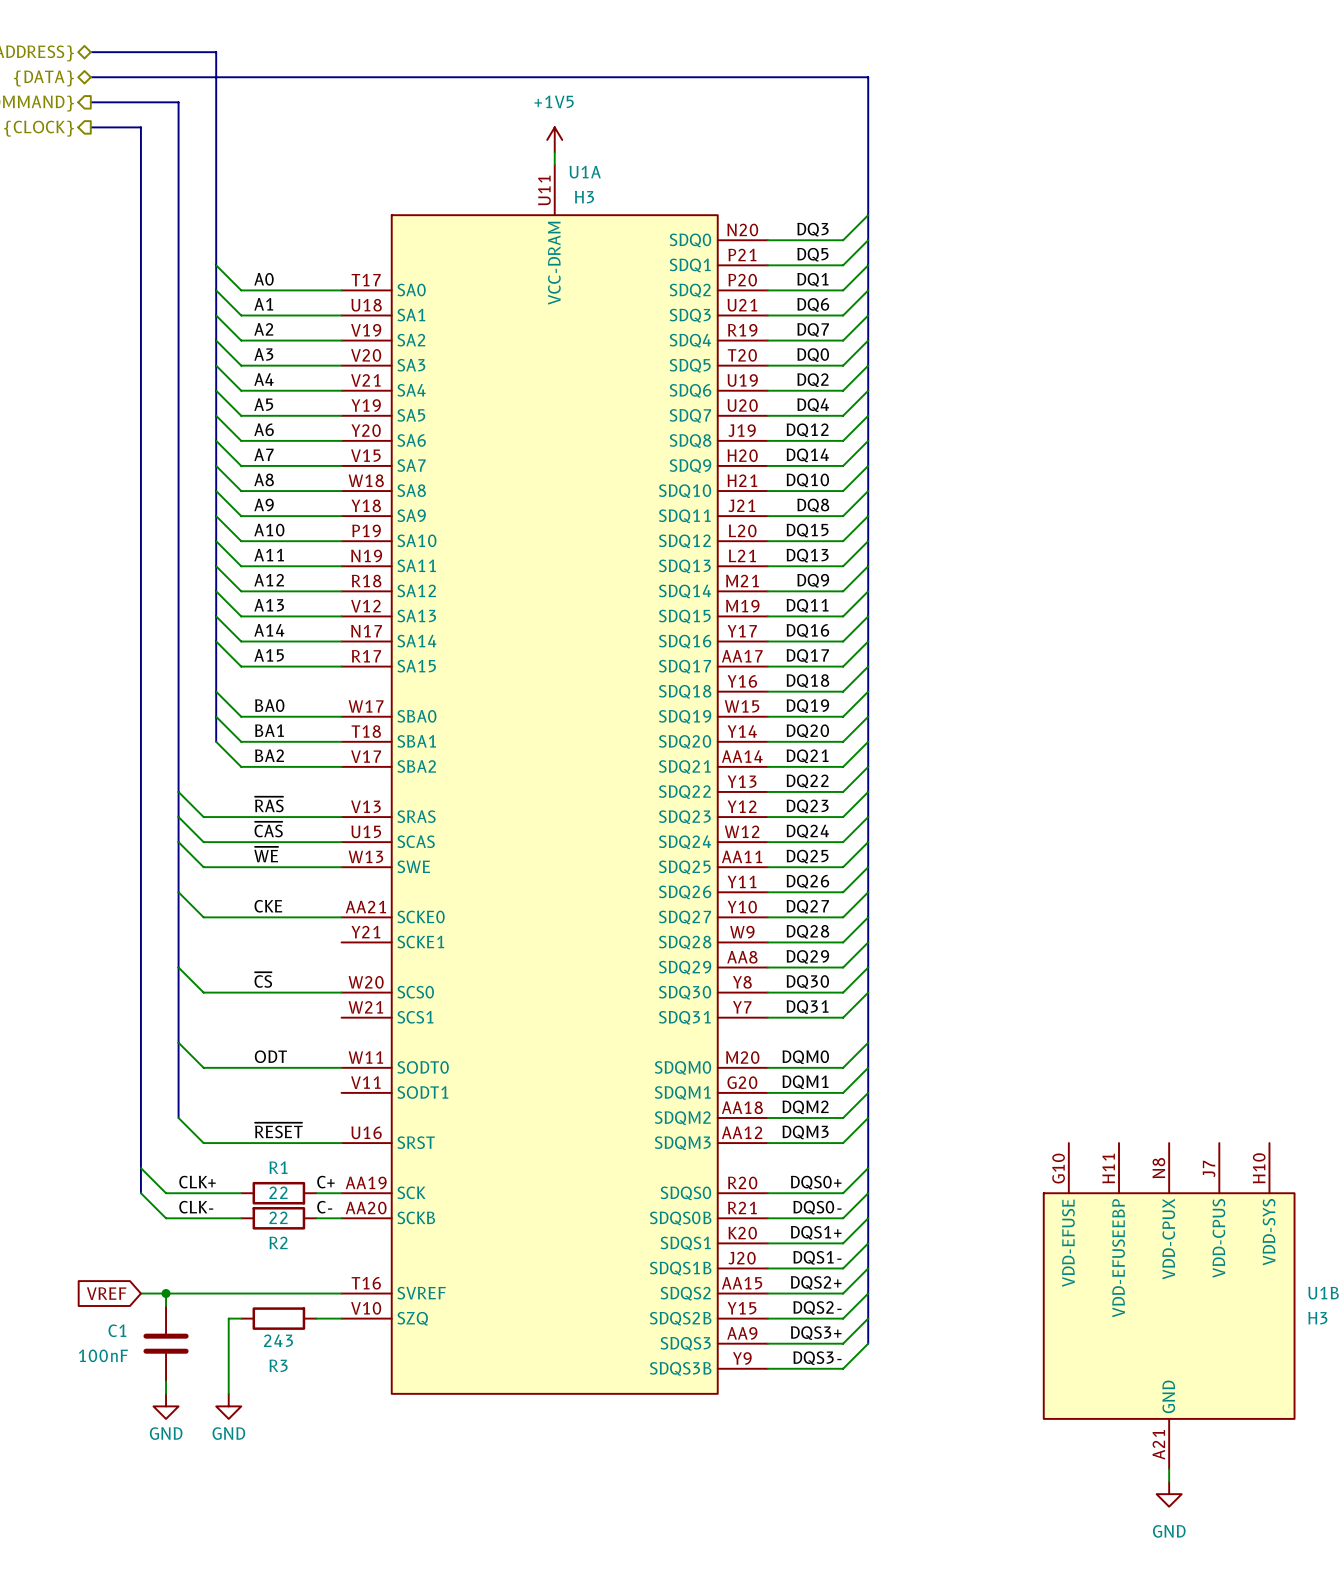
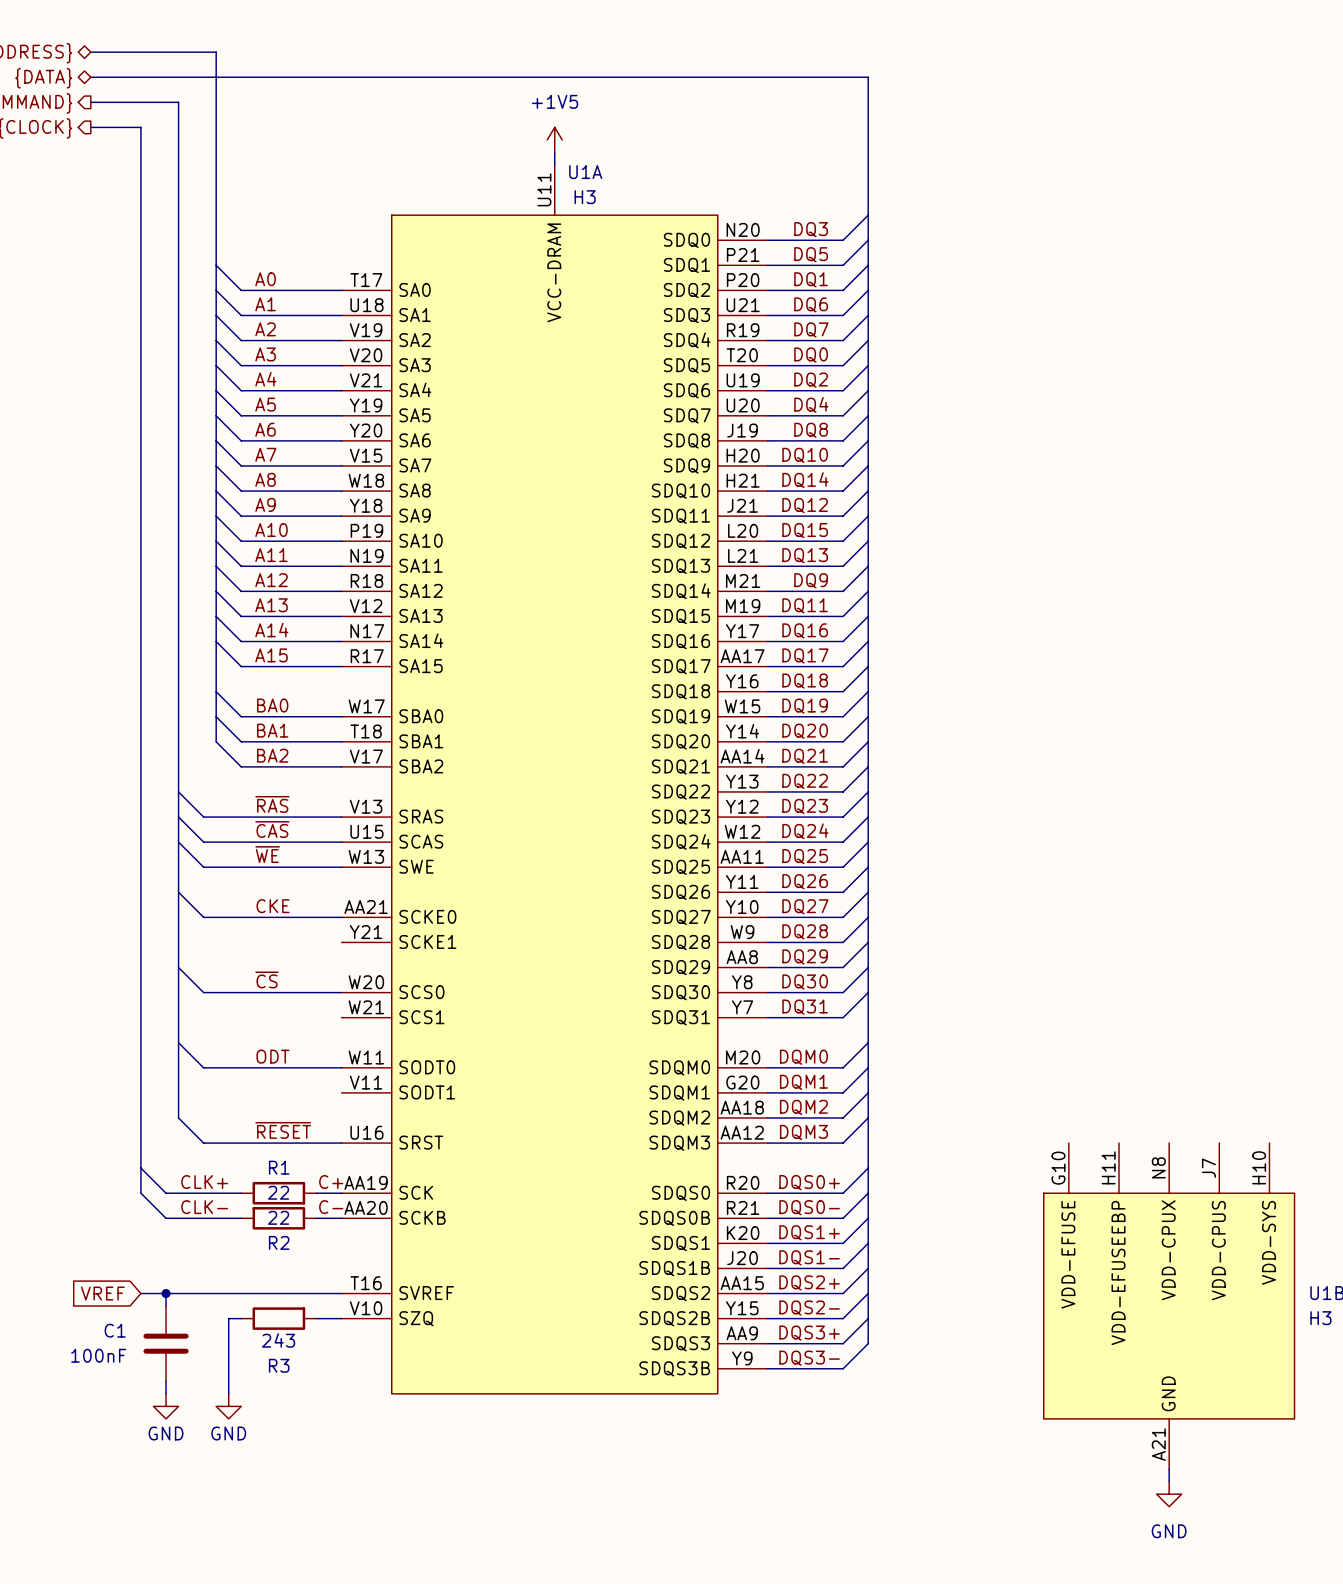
label: DQ12 (807, 430) -> DQ8 (811, 430)
label: DQ14 (807, 455) -> DQ10 (805, 455)
label: DQ10 (807, 480) -> DQ14 (805, 480)
label: DQ8 (813, 505) -> DQ12 (805, 505)

